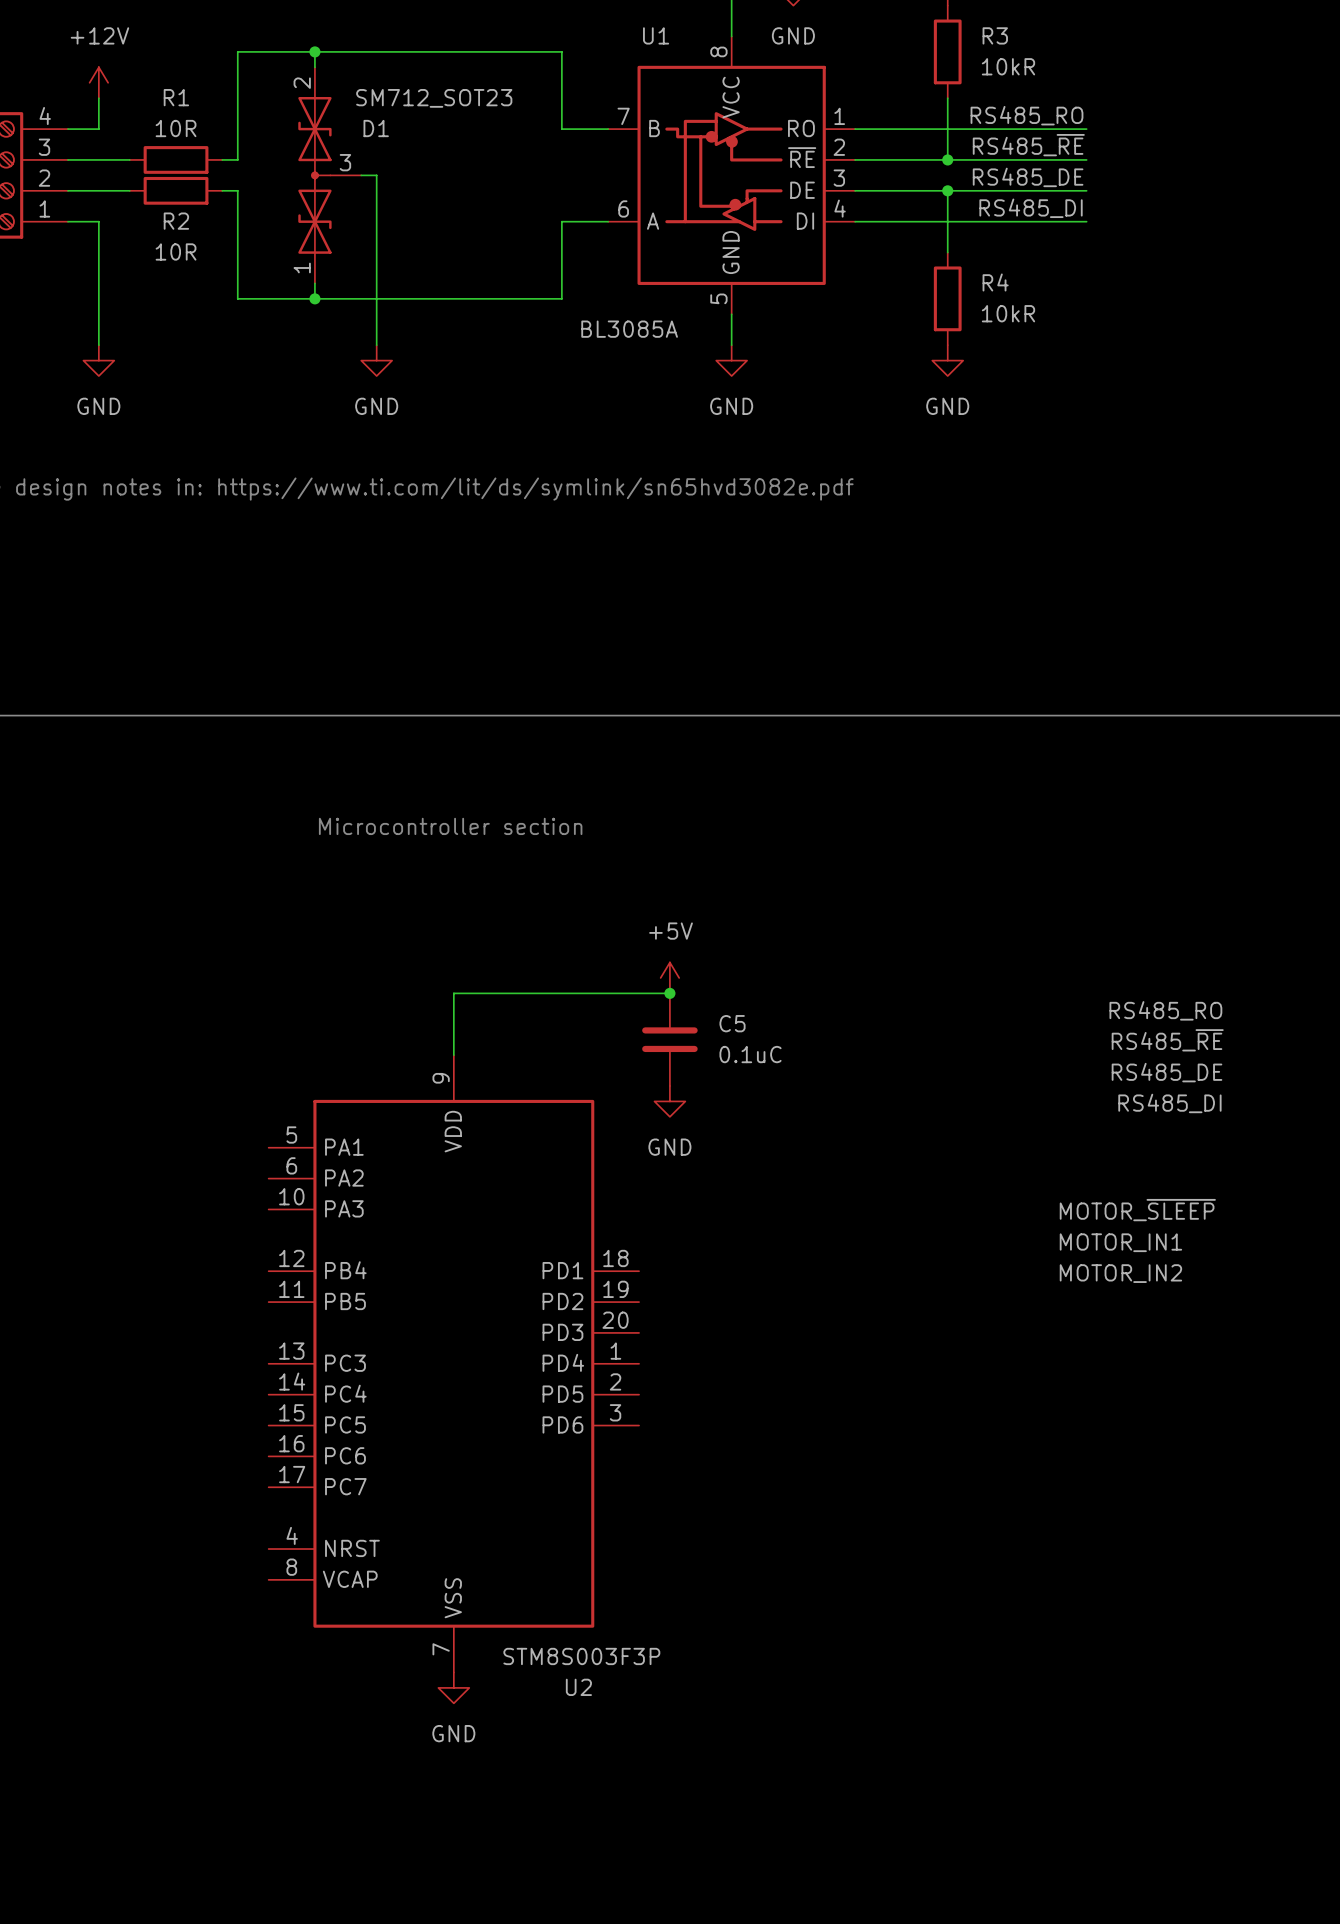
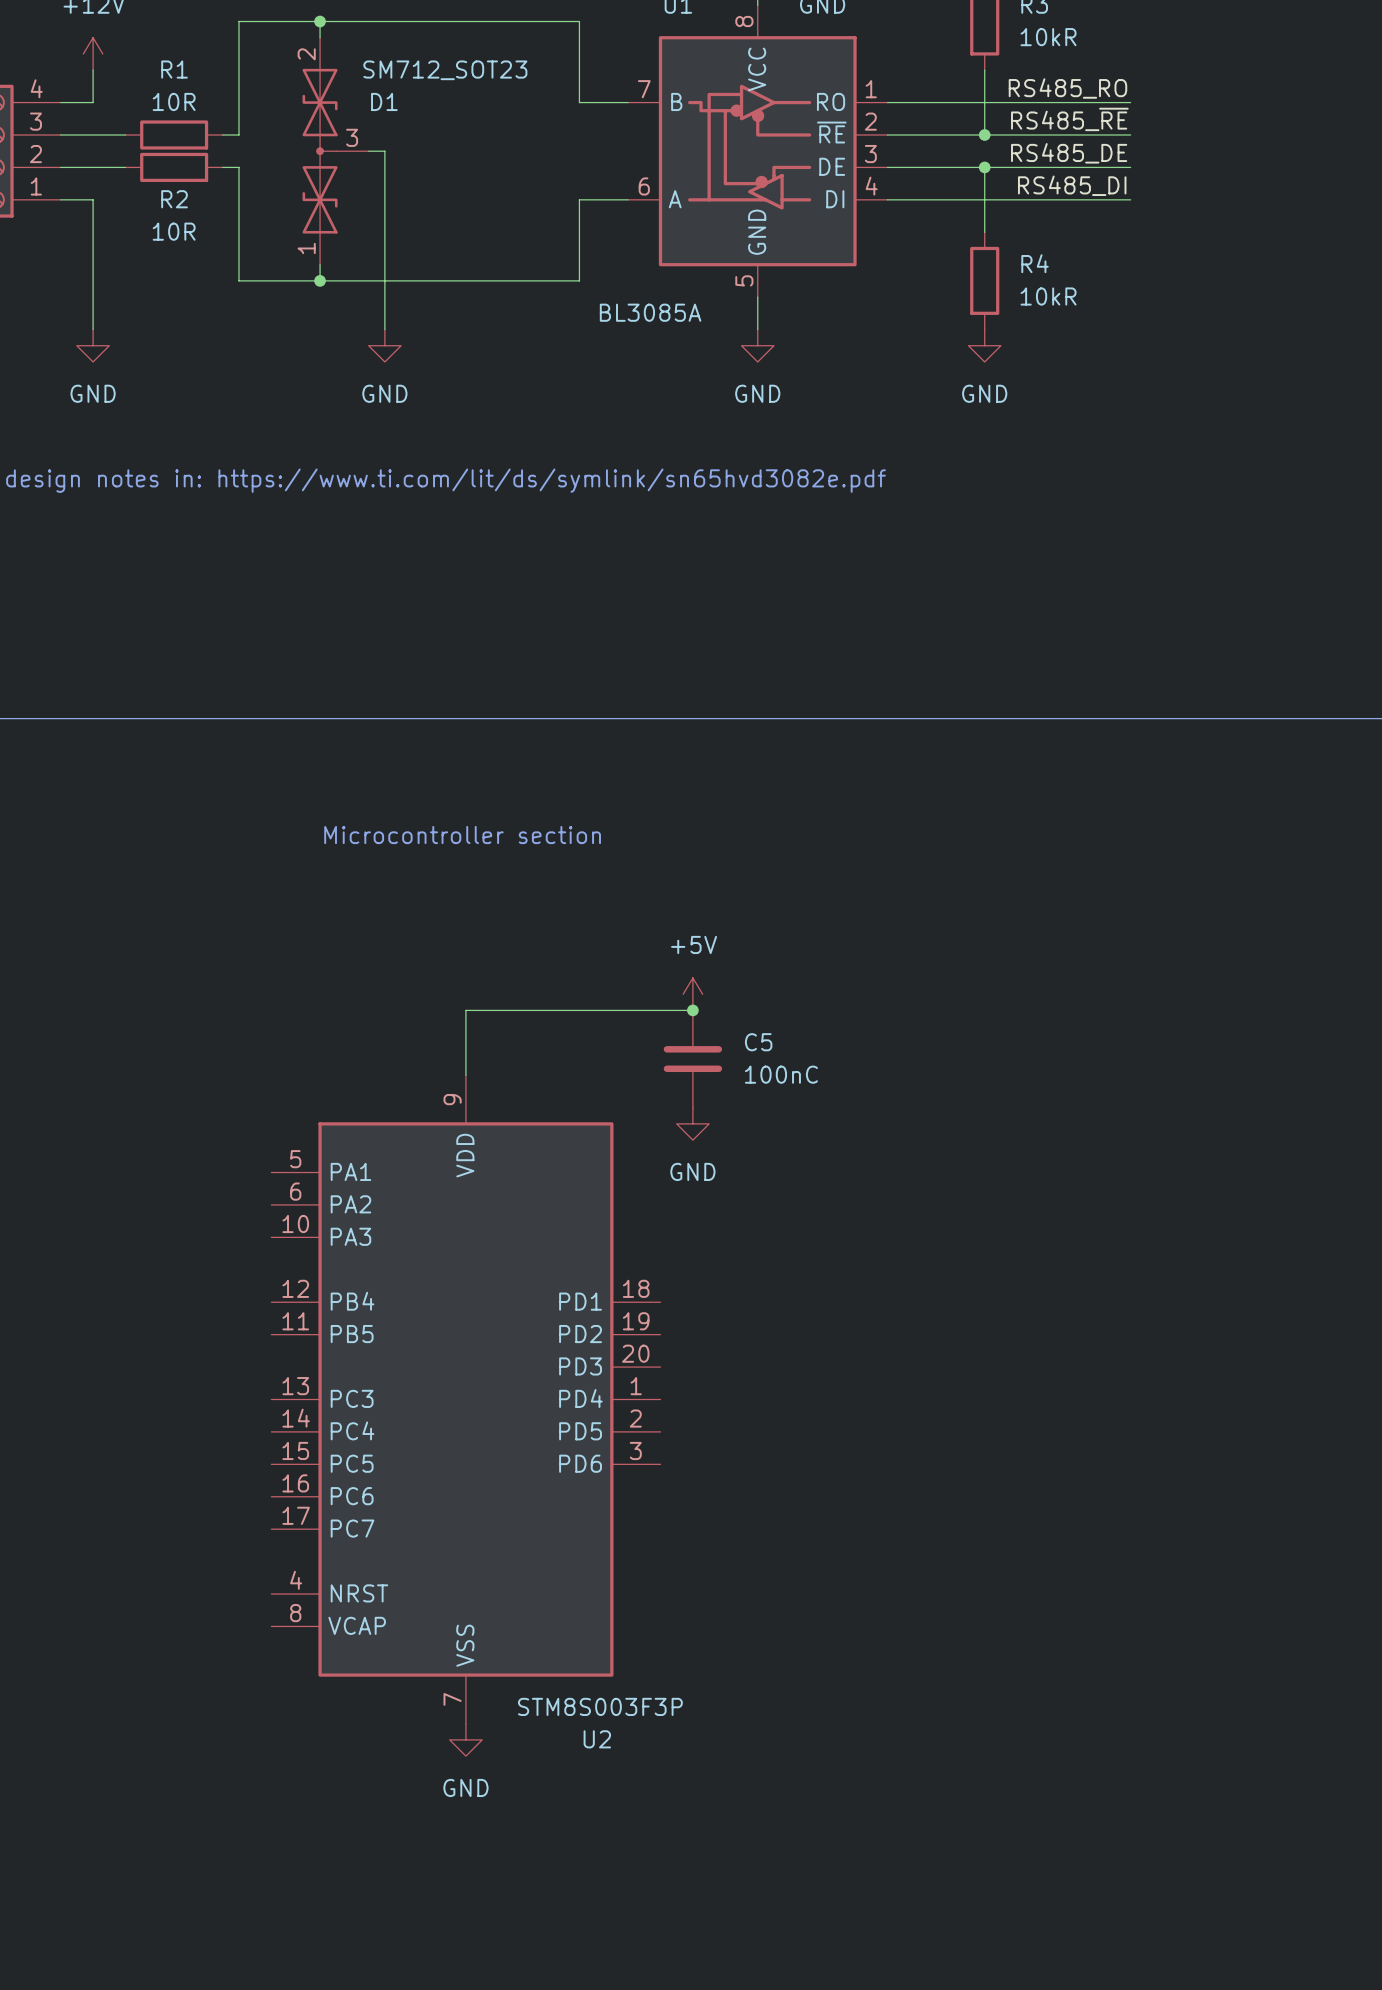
label: RS485_RO (1165, 1010) -> none
label: RS485_~{RE} (1167, 1040) -> none
C5 value: 0.1uC (750, 1054) -> 100nC (781, 1074)
label: RS485_DE (1166, 1072) -> none
label: RS485_DI (1169, 1103) -> none
label: MOTOR_~{SLEEP} (1137, 1210) -> none
label: MOTOR_IN1 (1120, 1242) -> none
label: MOTOR_IN2 (1120, 1273) -> none

